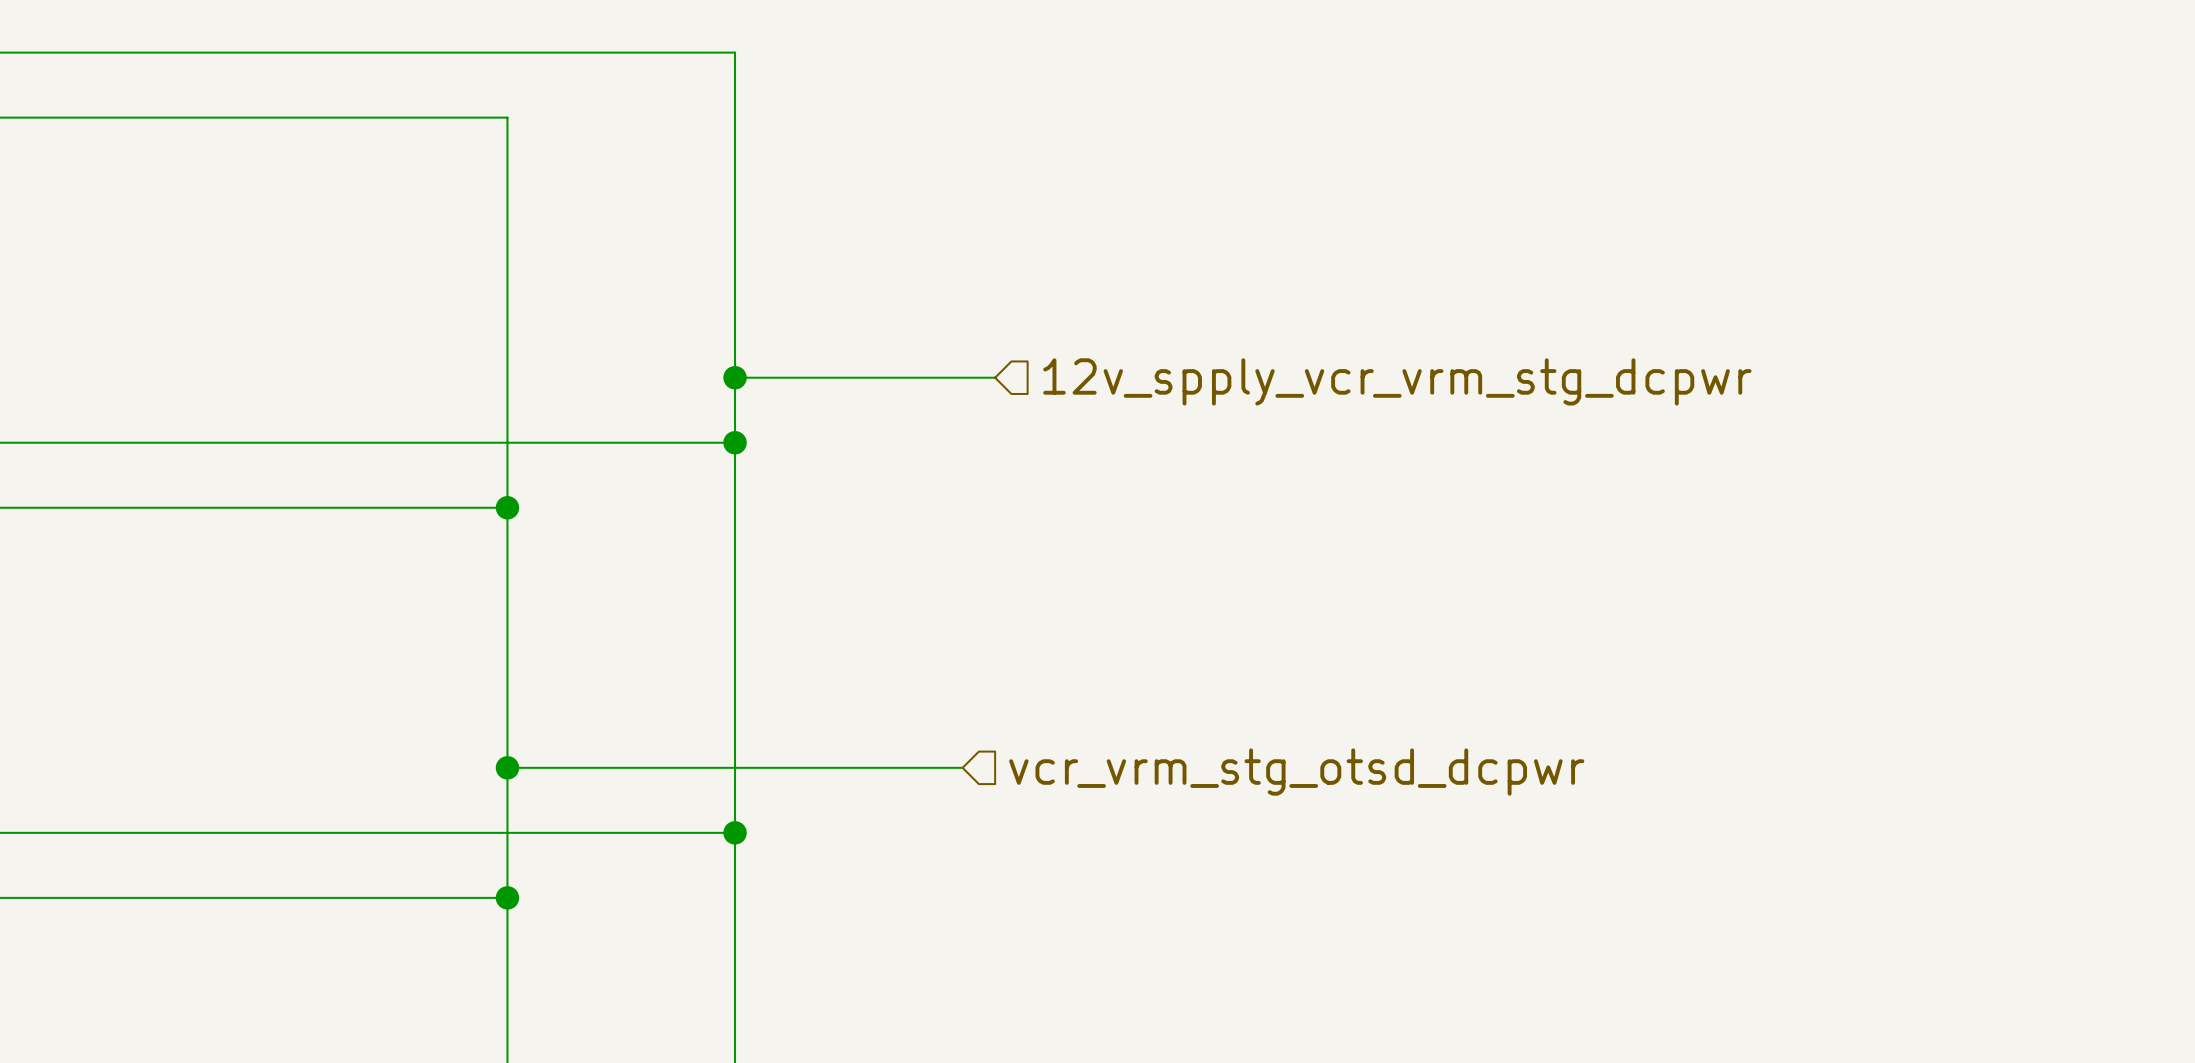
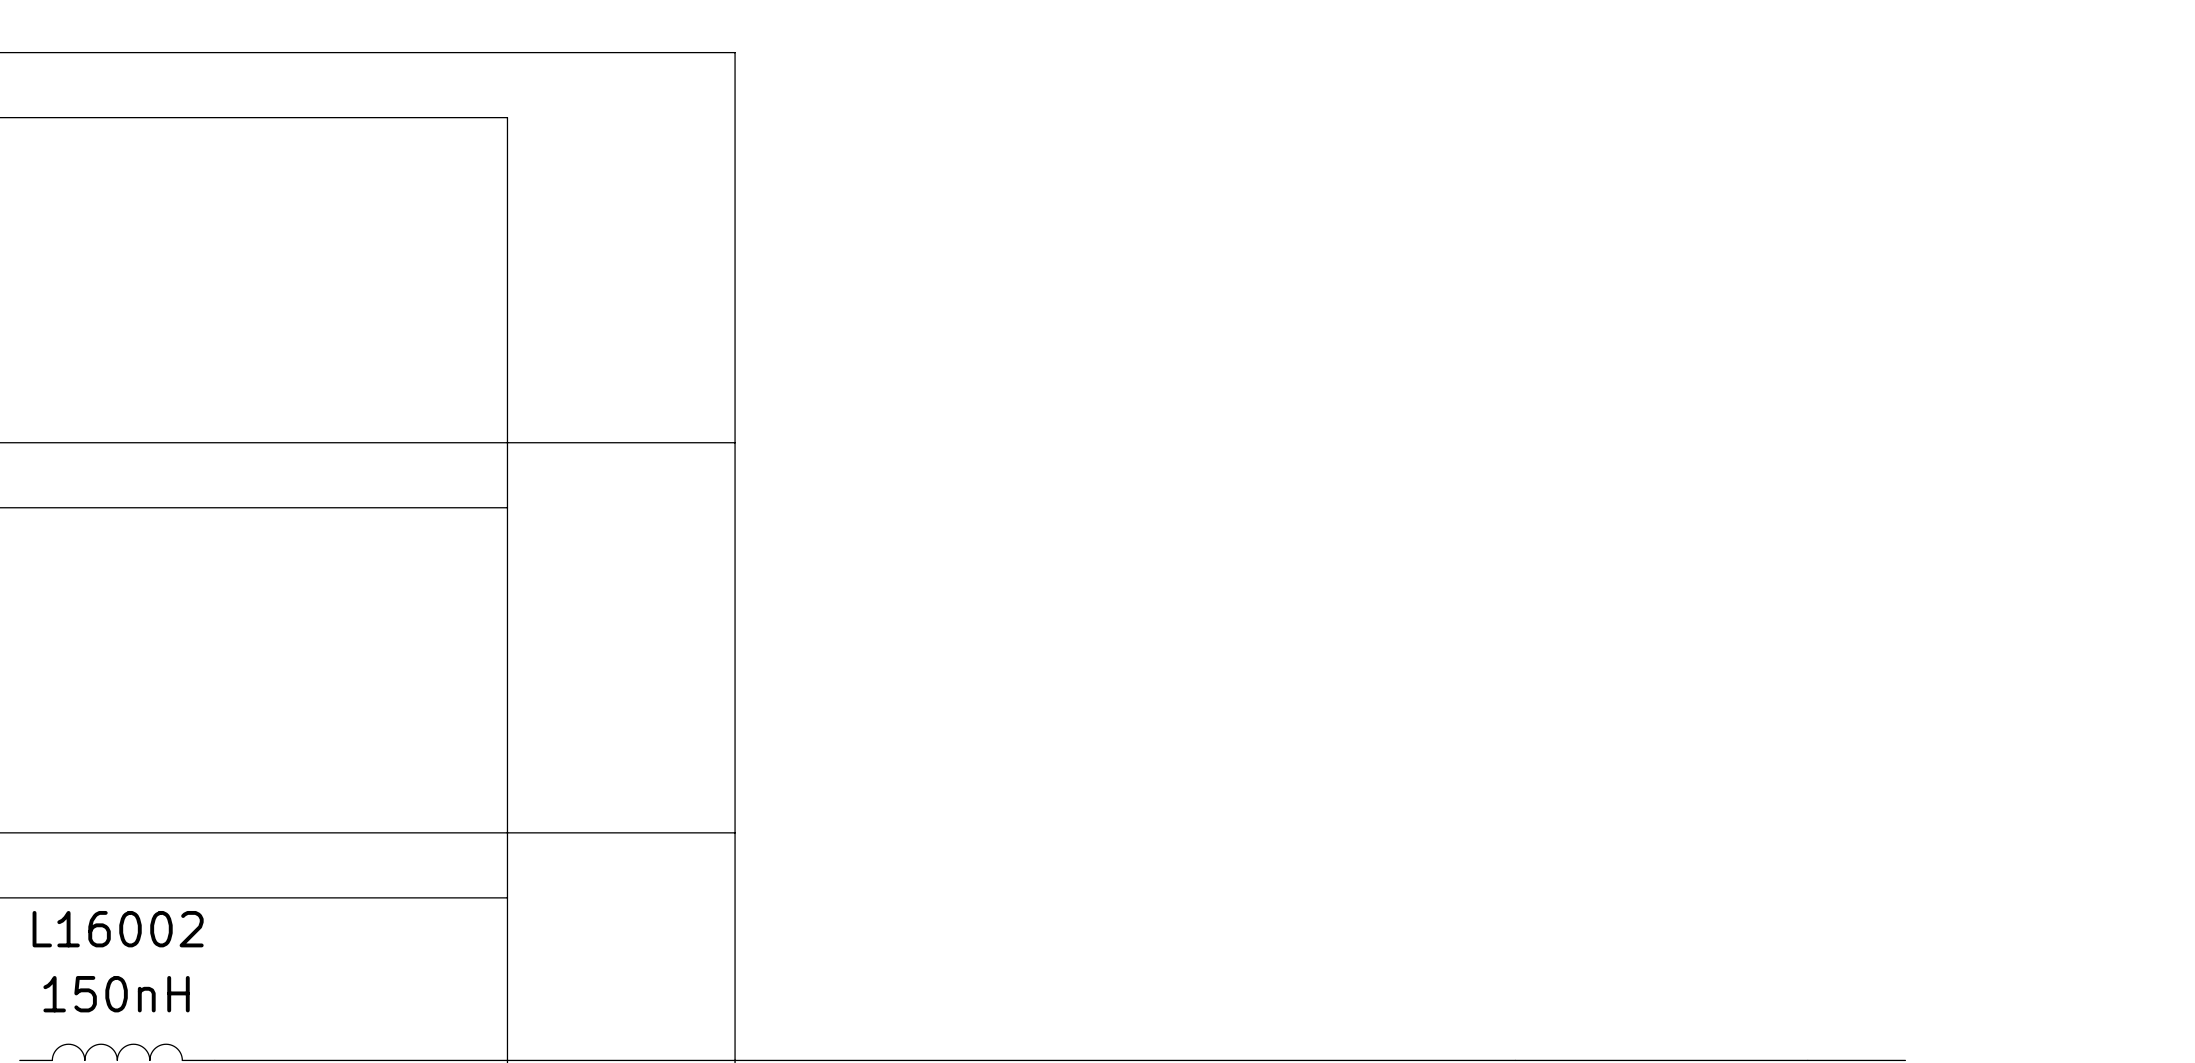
wire: (735, 377) (995, 377) -> none
junction: (735, 377) -> none
hierarchical label: 12v_spply_vcr_vrm_stg_dcpwr (1397, 381) -> none
junction: (735, 442) -> none
junction: (507, 507) -> none
wire: (507, 767) (962, 767) -> none
junction: (507, 767) -> none
hierarchical label: vcr_vrm_stg_otsd_dcpwr (1296, 772) -> none
junction: (735, 832) -> none
junction: (507, 897) -> none
L16002: none -> 150nH (117, 1052)
wire: none -> (214, 1060) (1905, 1060)

